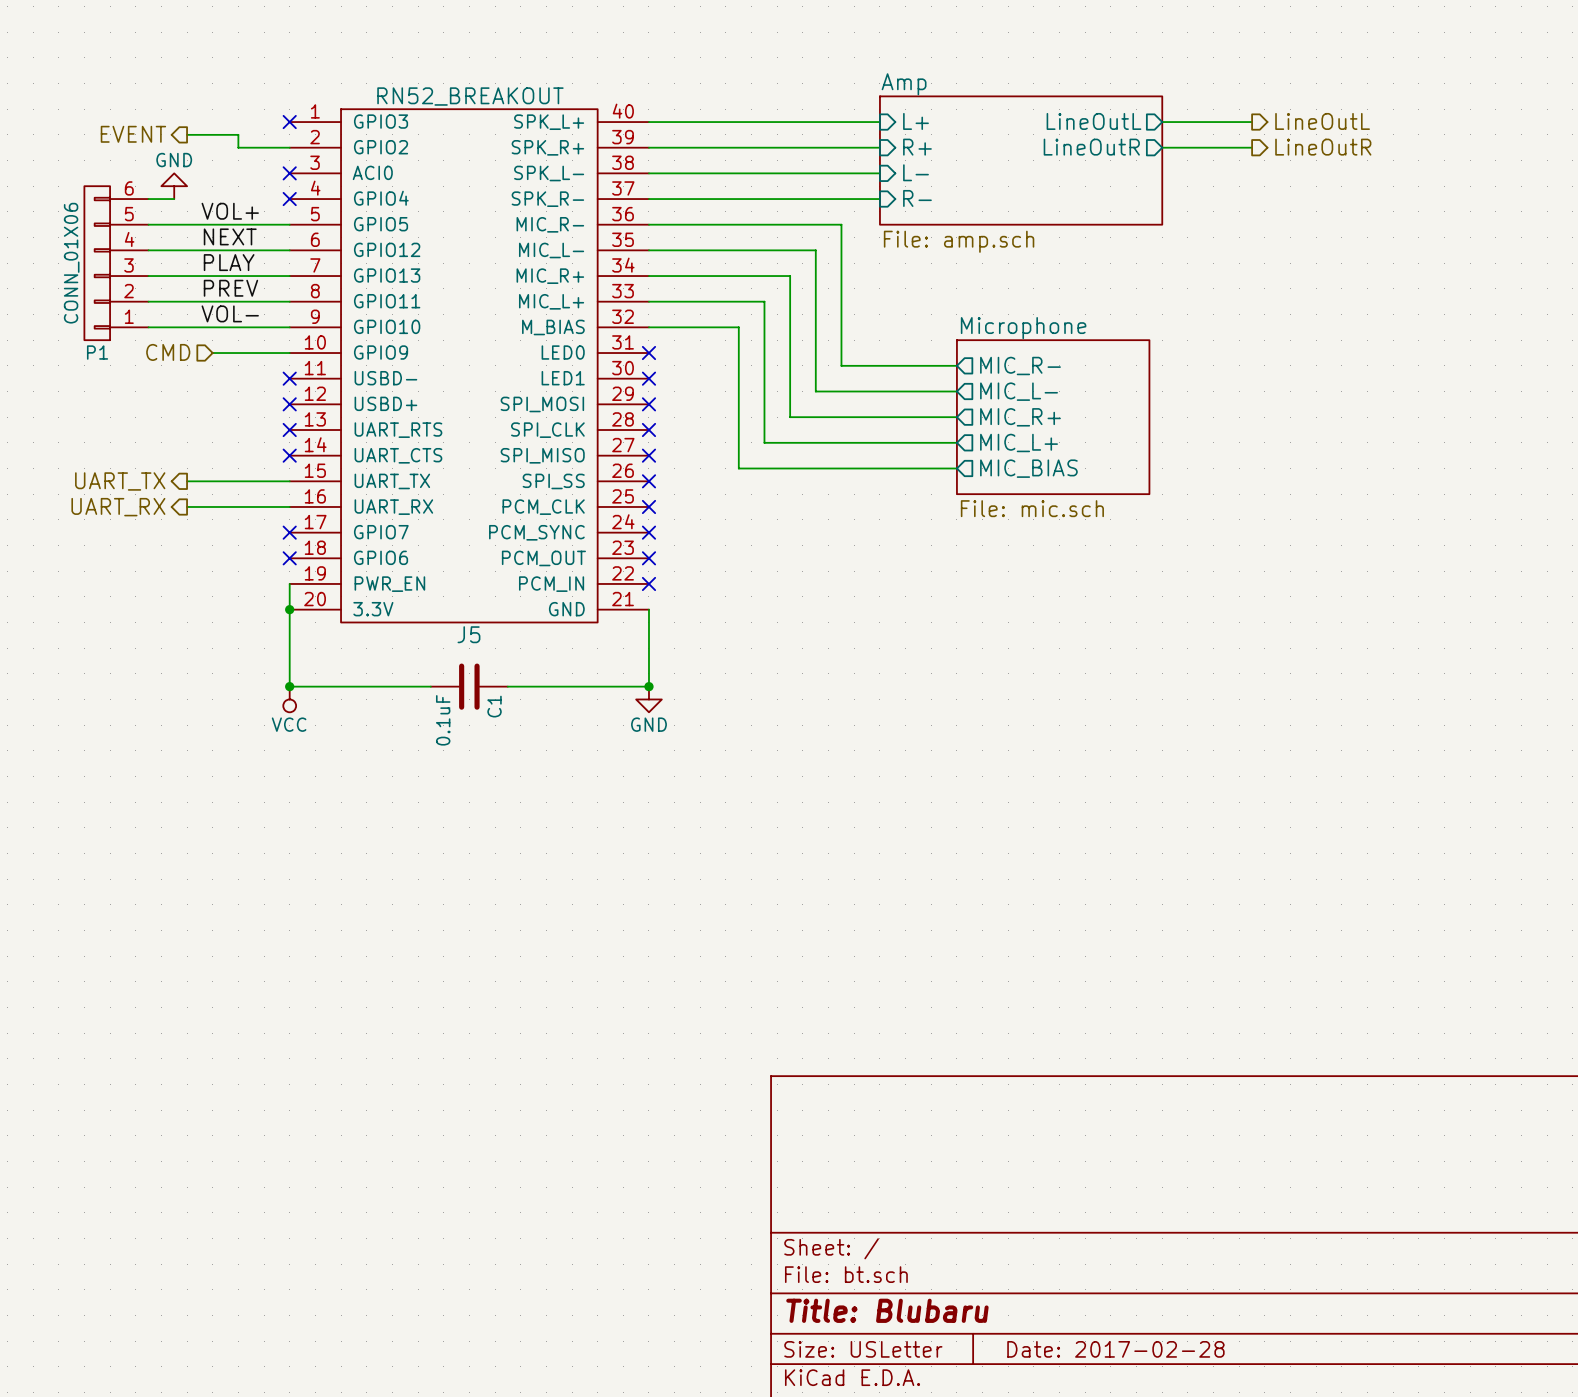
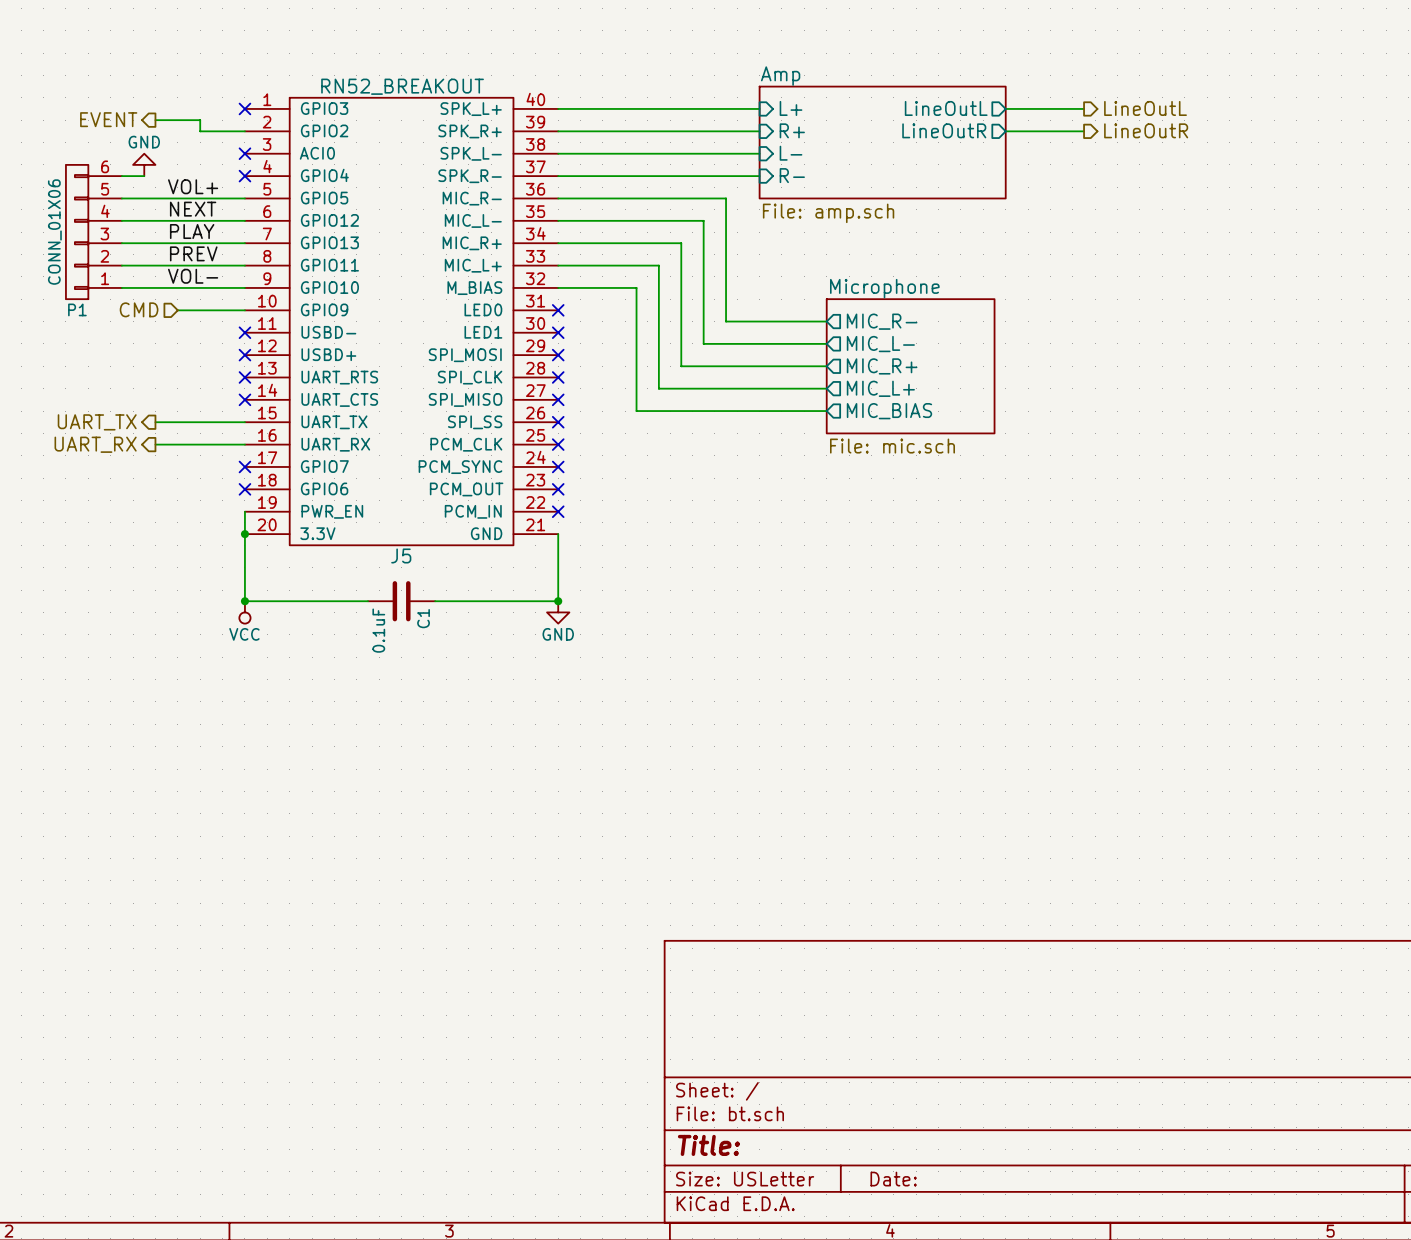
title block: Title: Blubaru (887, 1310) -> Title: (708, 1145)
title block: Date: 2017-02-28 (1115, 1349) -> Date: (893, 1179)

